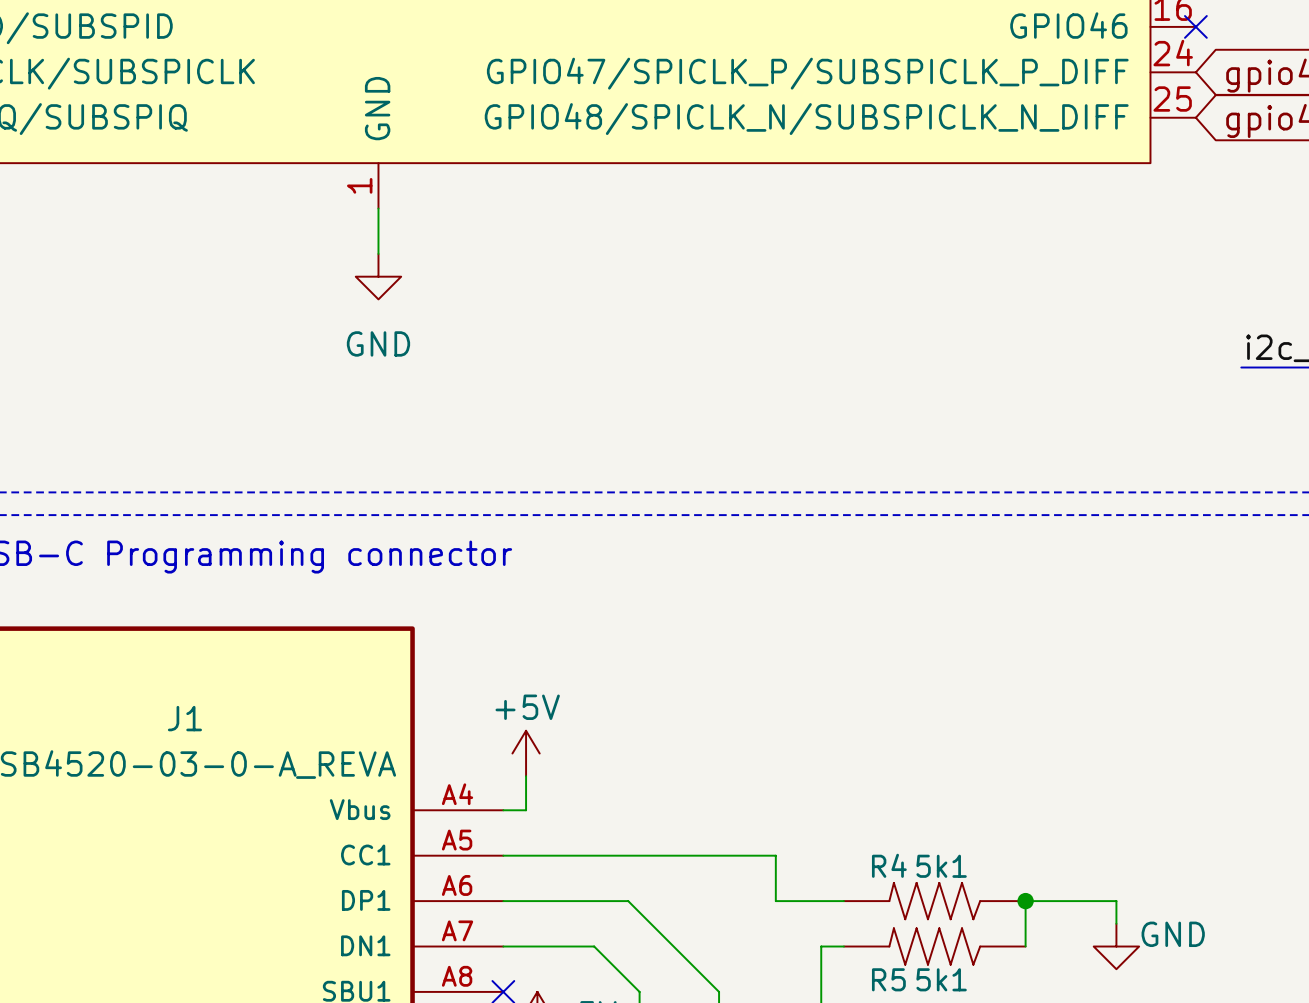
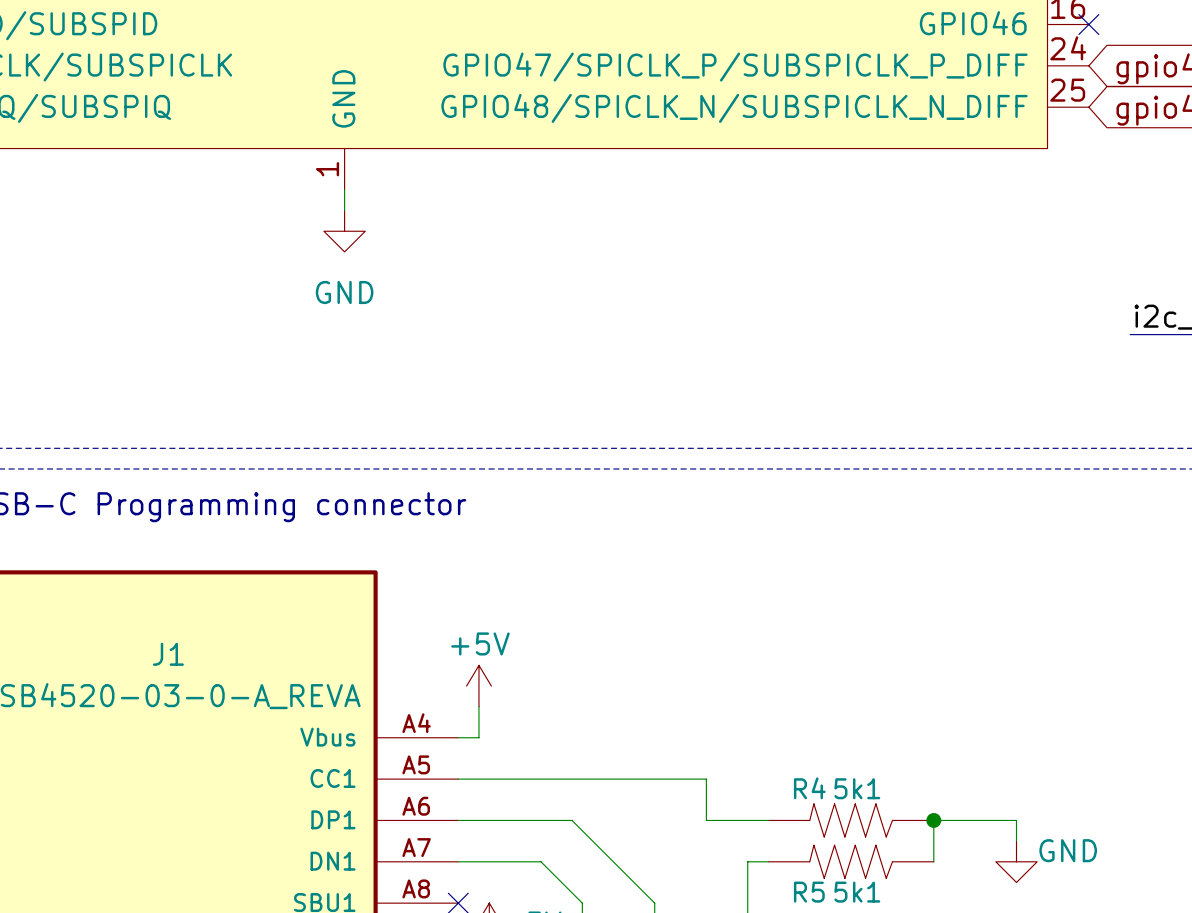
power symbol position: GND (378, 276) -> GND (344, 231)

